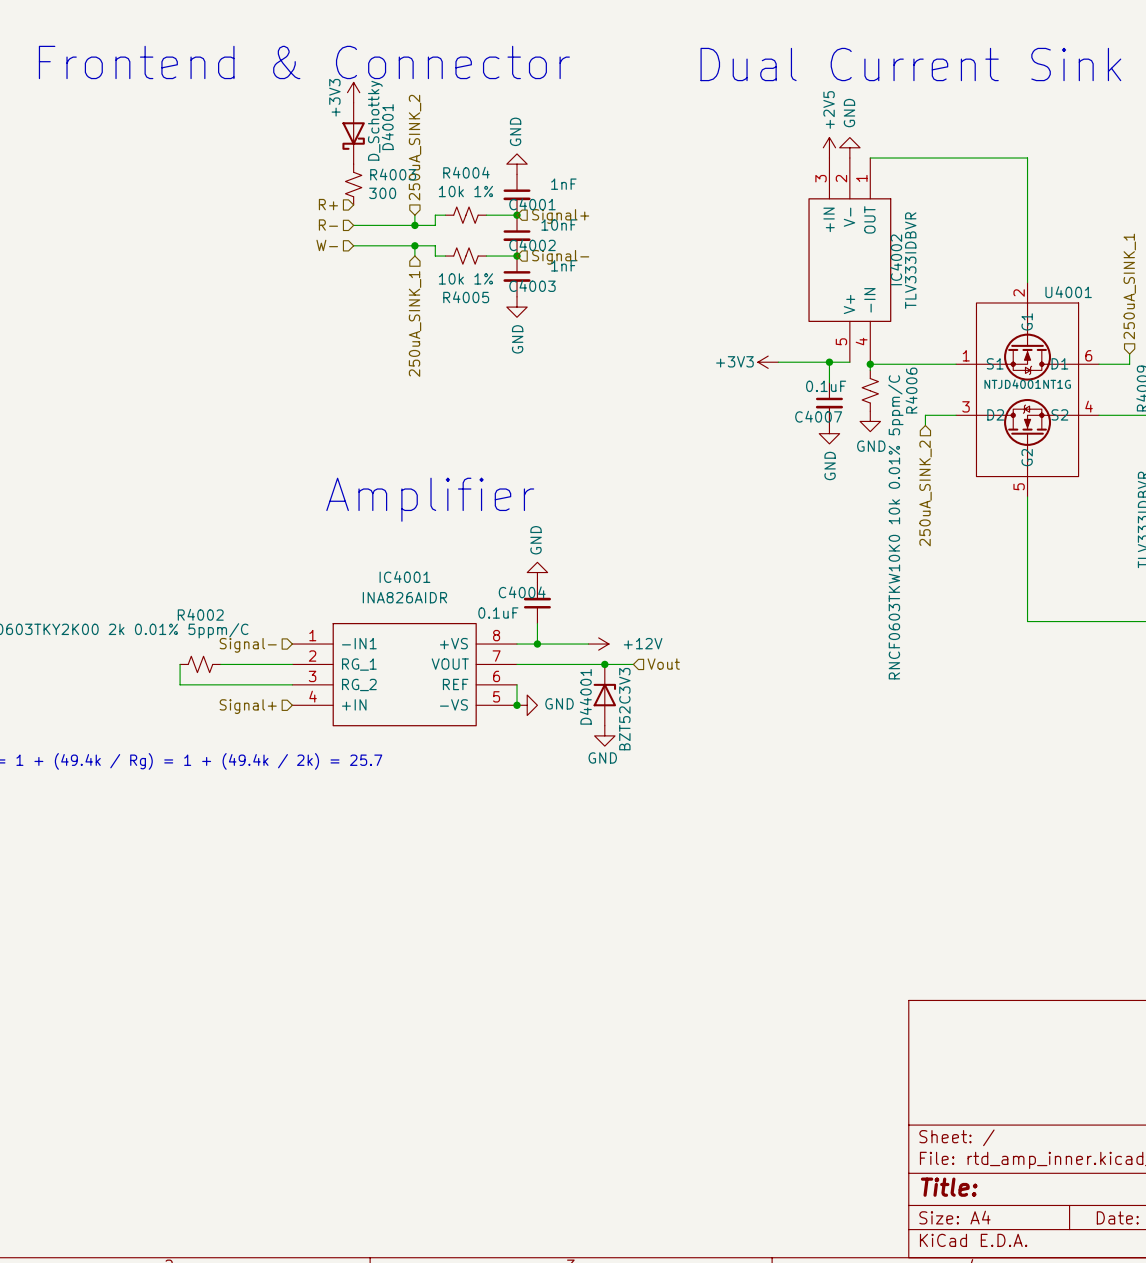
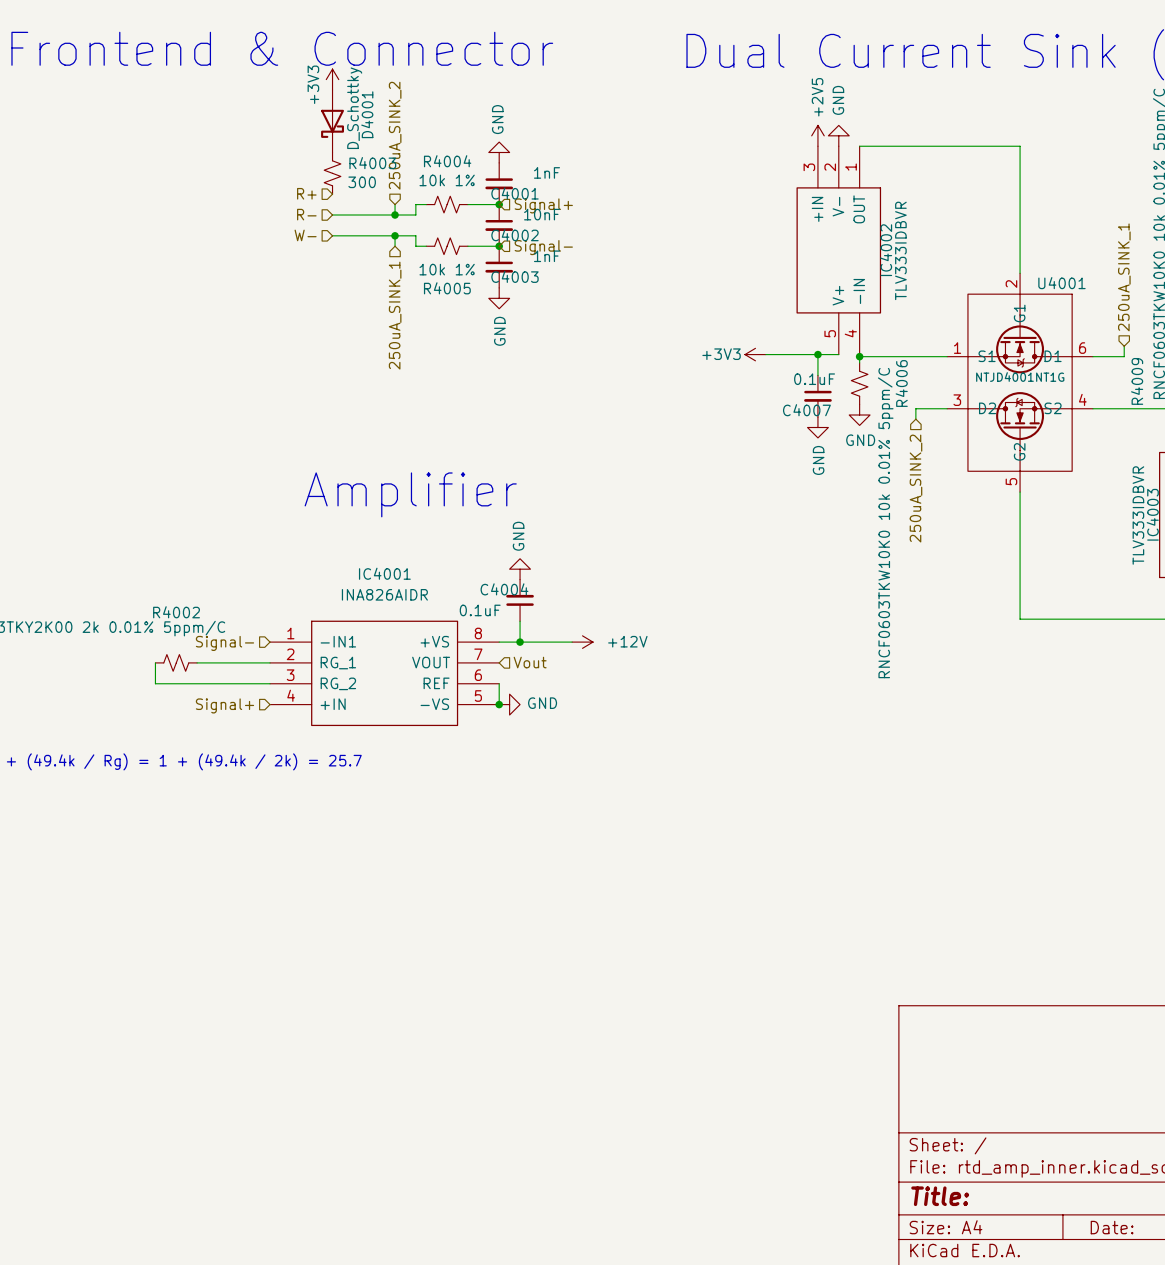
wire: (517, 664) (633, 664) -> none
junction: (604, 664) -> none
hierarchical label position: Vout (663, 664) -> Vout (530, 662)
D44001: BZT52C3V3 (604, 695) -> none
power symbol: GND (604, 735) -> none

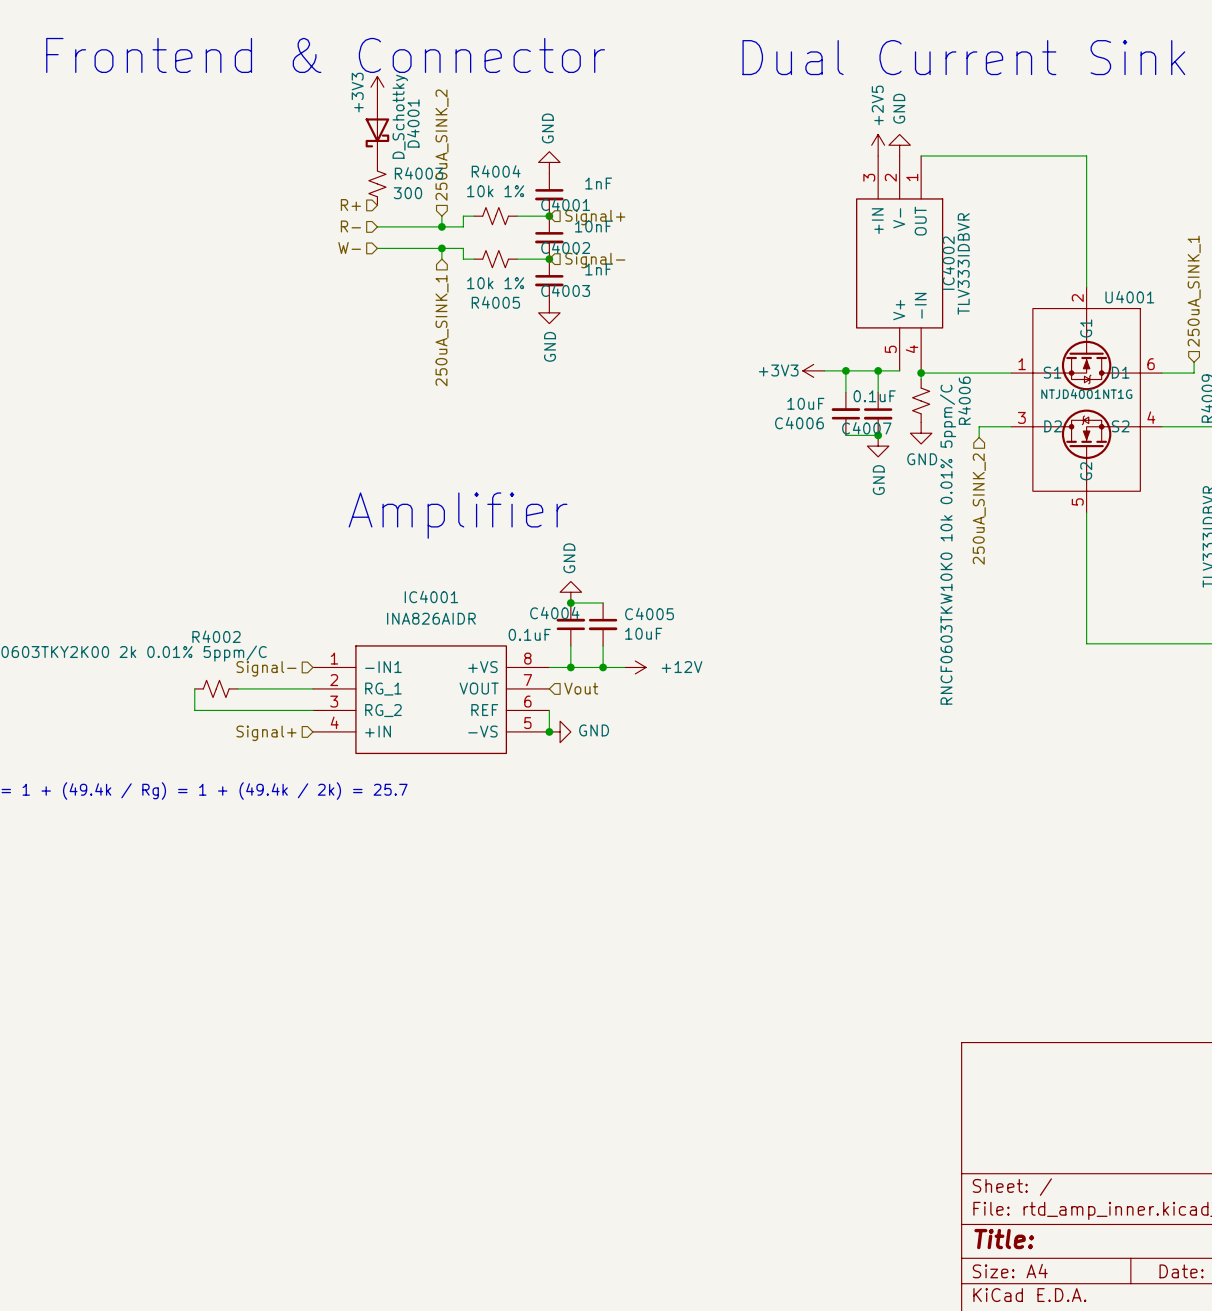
wire: none -> (845, 370) (845, 392)
junction: none -> (845, 370)
C4006: none -> 10uF (845, 413)
wire: none -> (845, 435) (878, 435)
junction: none -> (878, 435)
wire: none -> (570, 602) (603, 602)
junction: none -> (570, 602)
C4005: none -> 10uF (603, 624)
wire: none -> (603, 645) (603, 667)
junction: none -> (603, 667)

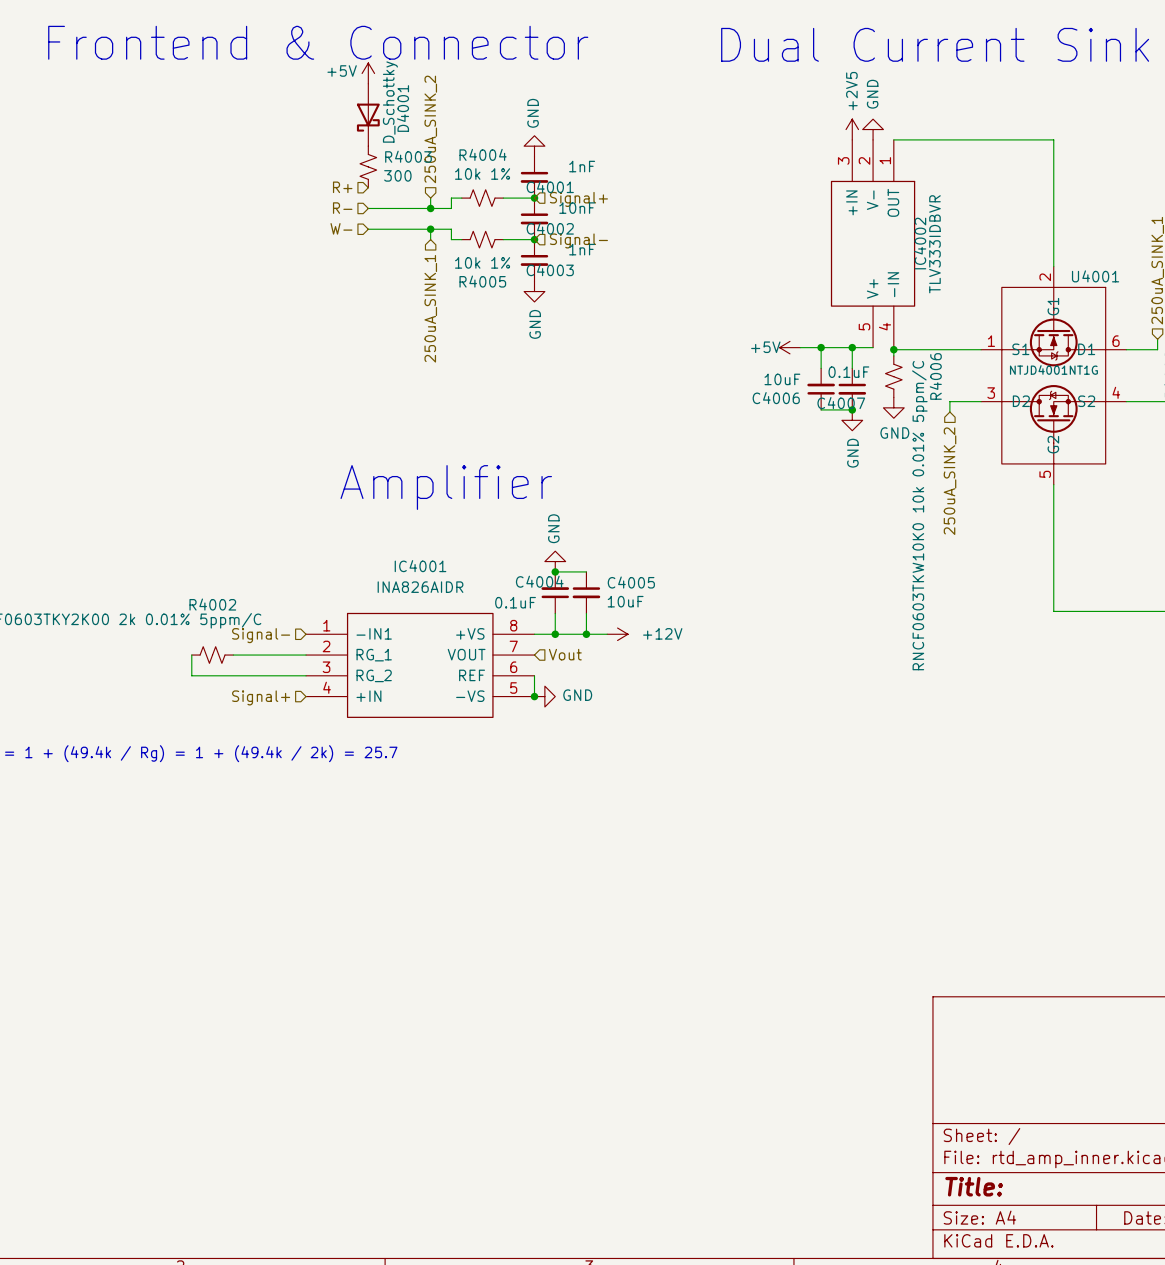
power symbol: +3V3 (377, 87) -> +5V (368, 73)
power symbol: +3V3 (813, 370) -> +5V (789, 347)

